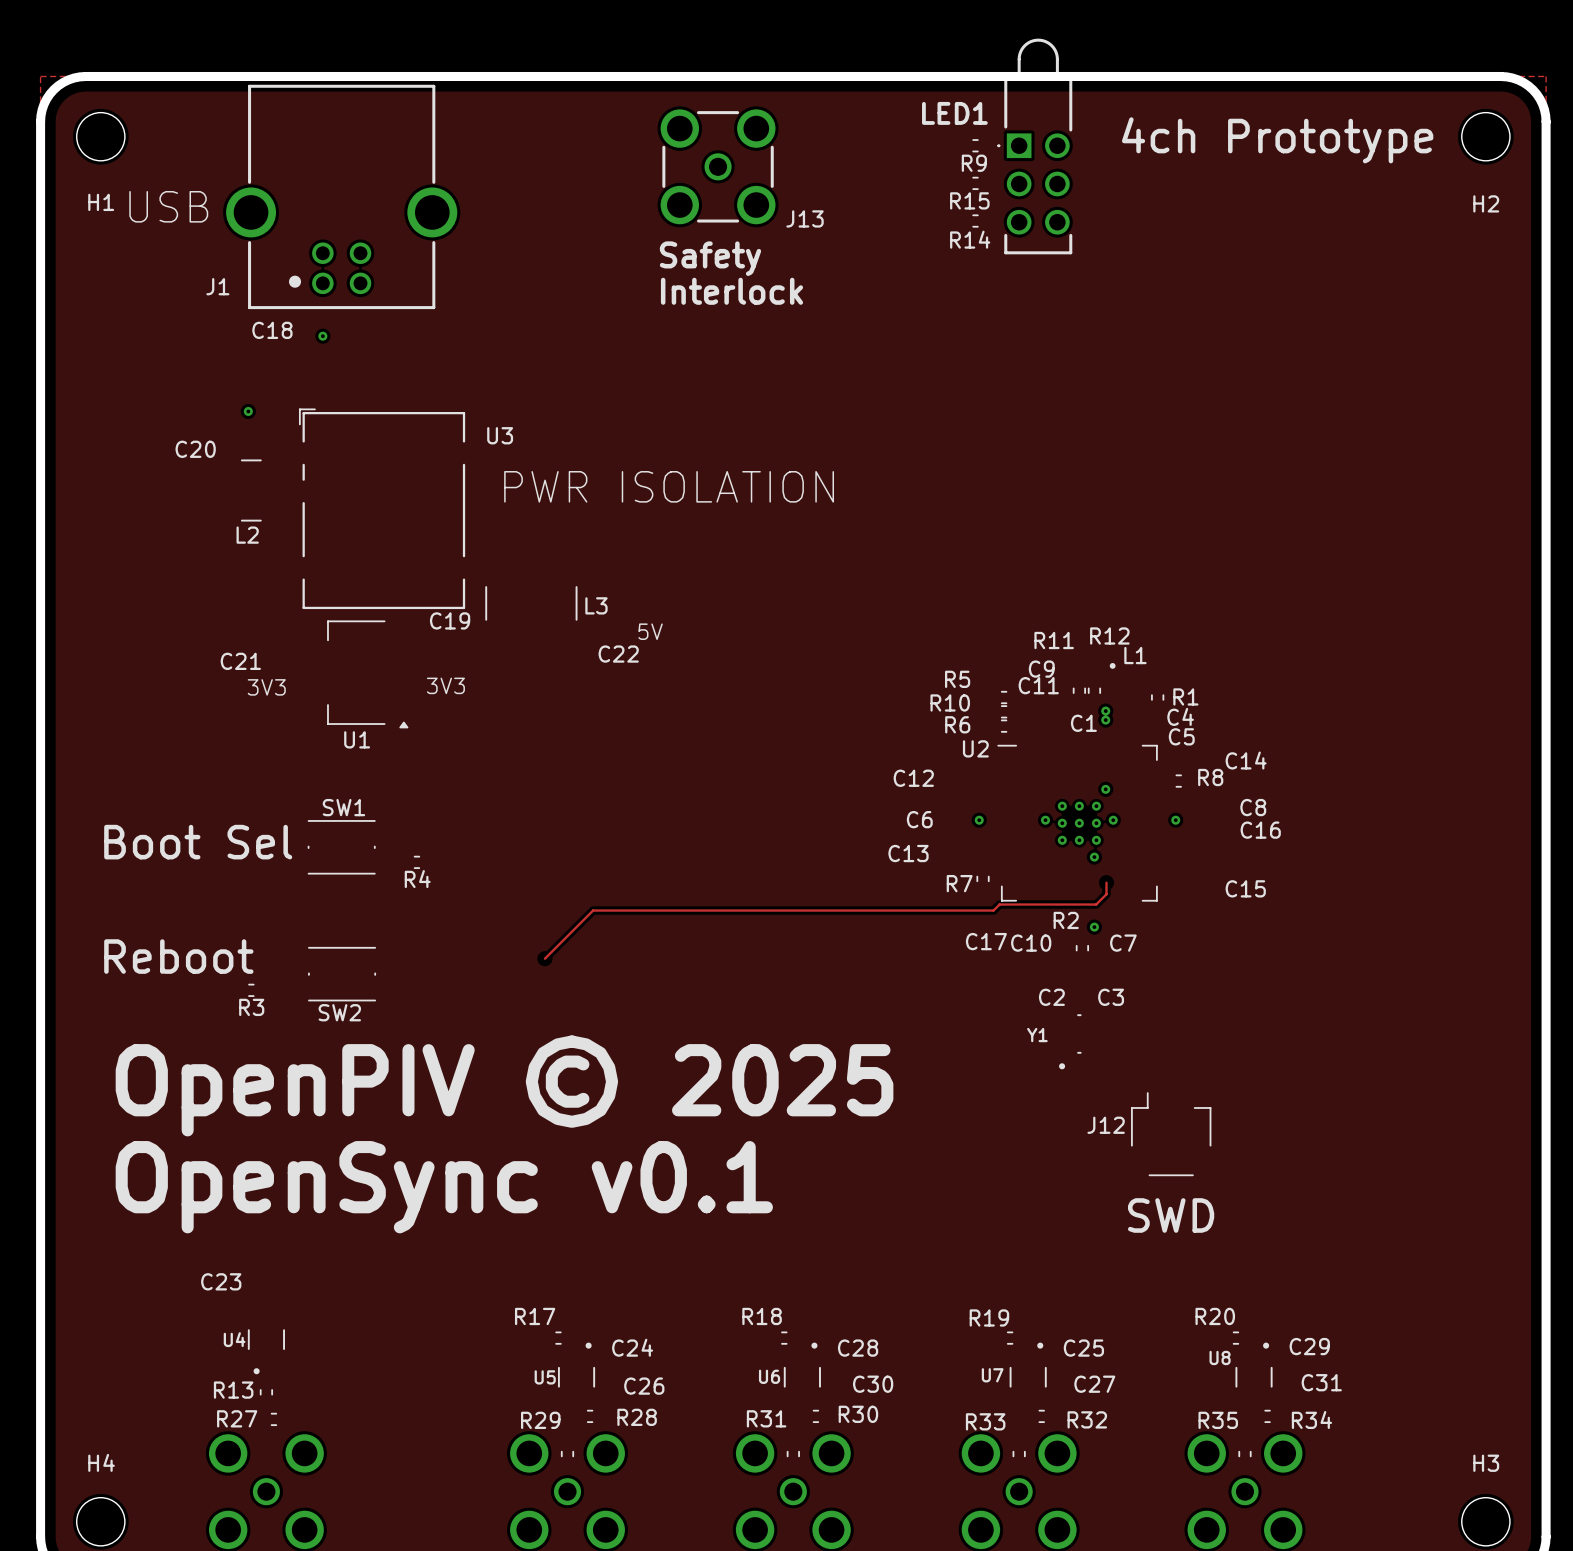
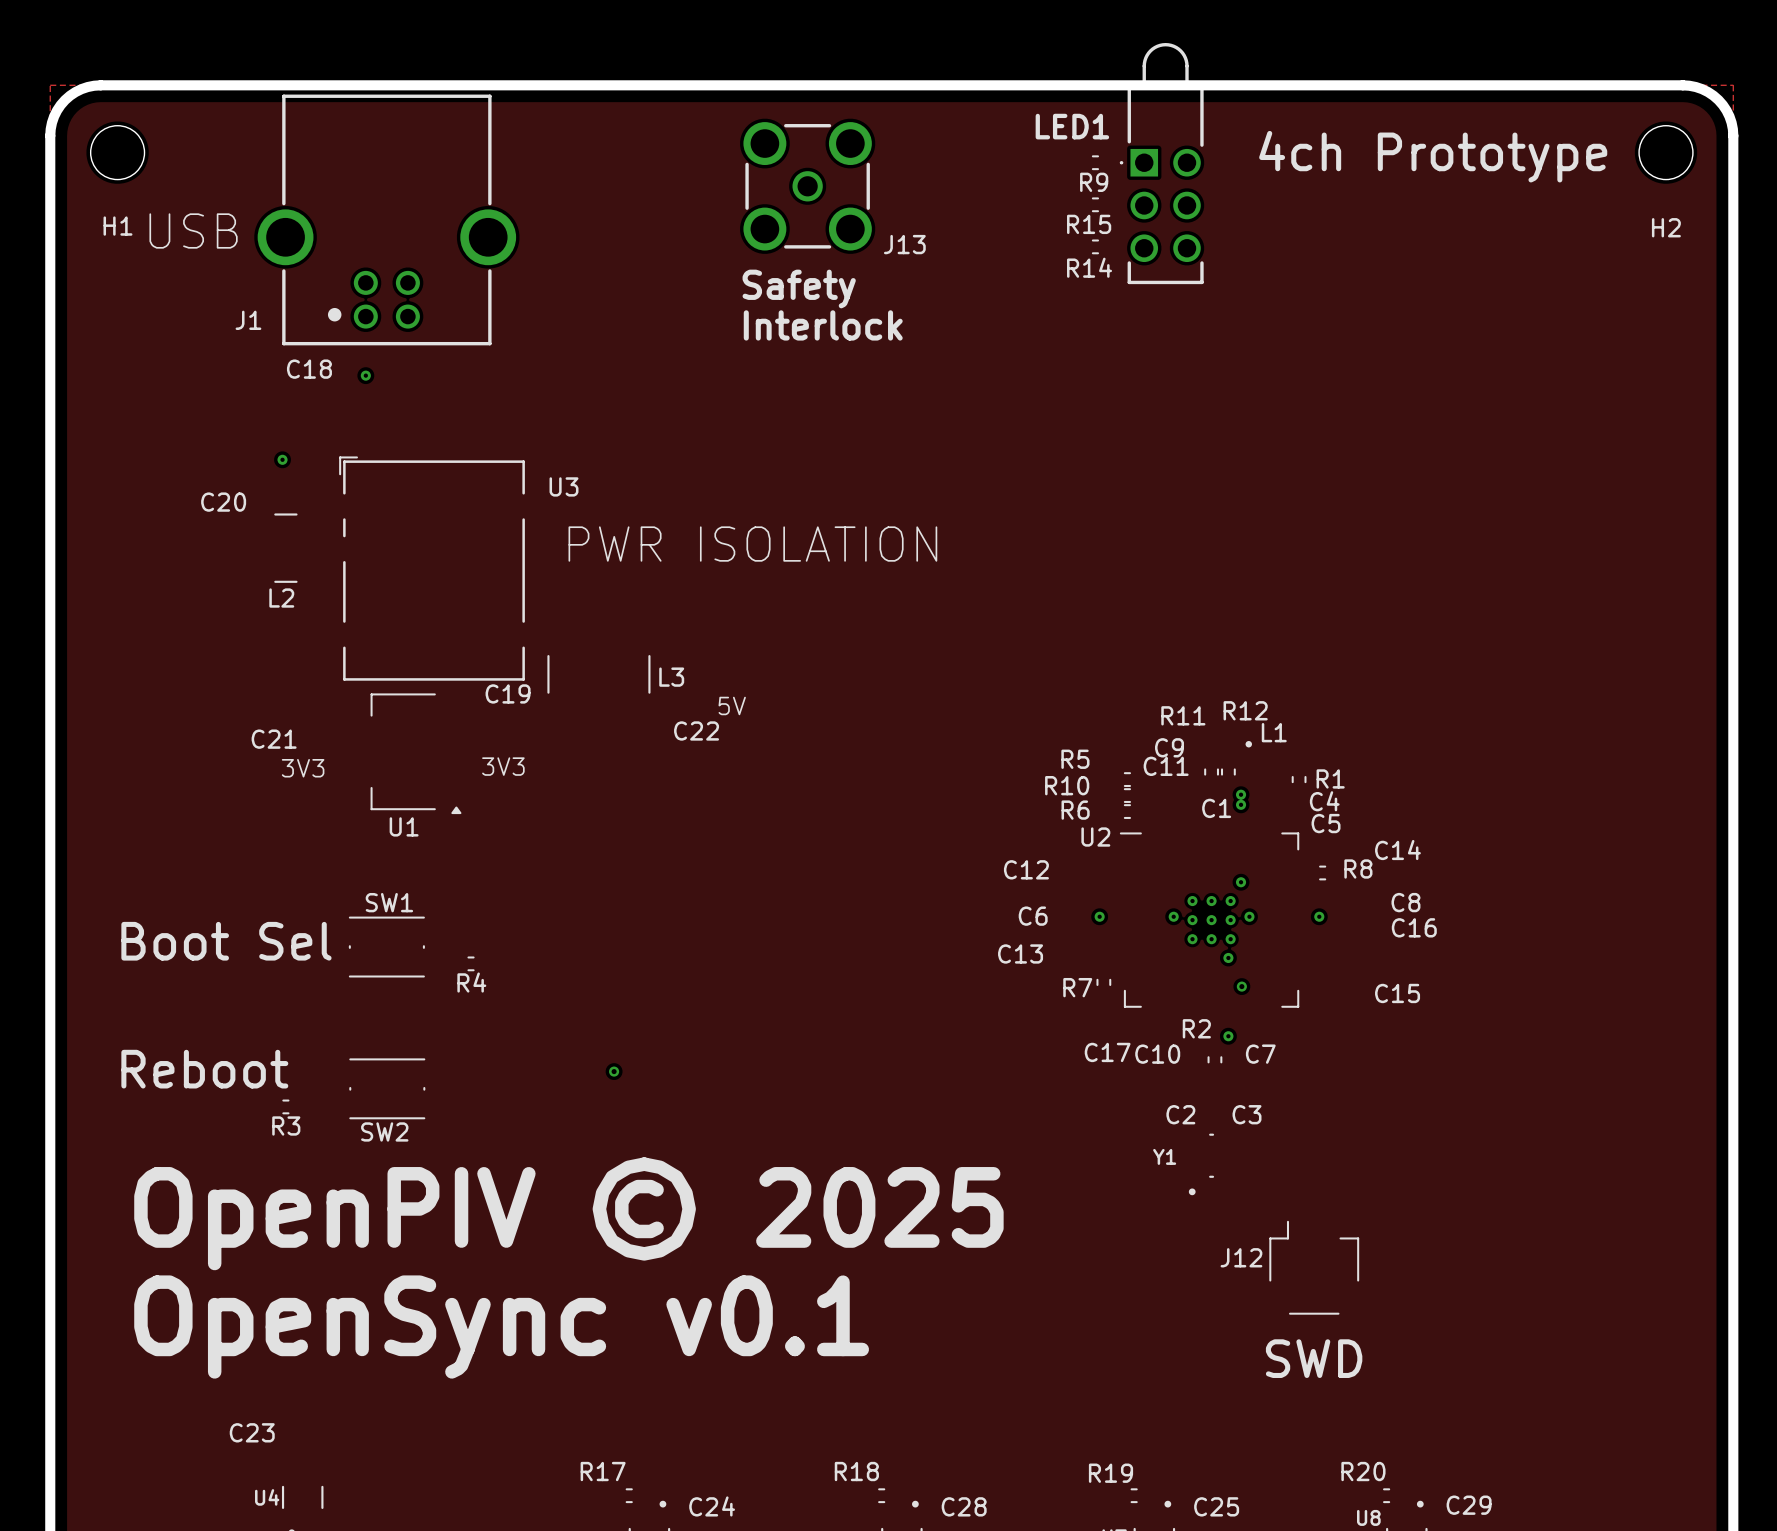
track: (1106, 882) (1106, 894) (1096, 904) (999, 904) (993, 910) (593, 910) (544, 958) -> none
via: none -> (1241, 986)
via: none -> (614, 1071)

